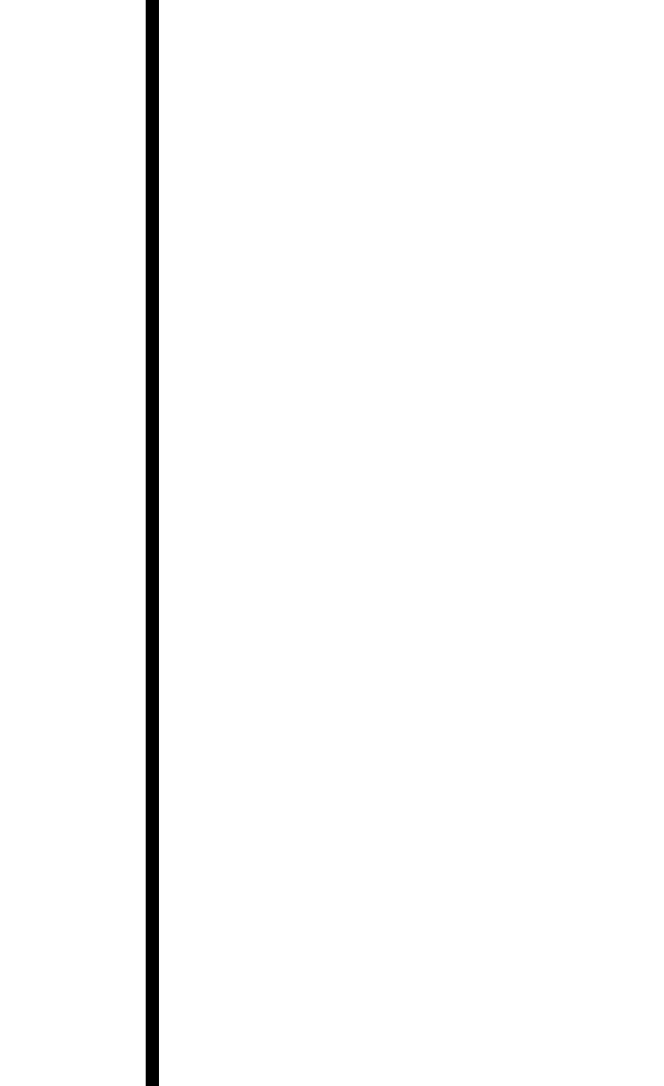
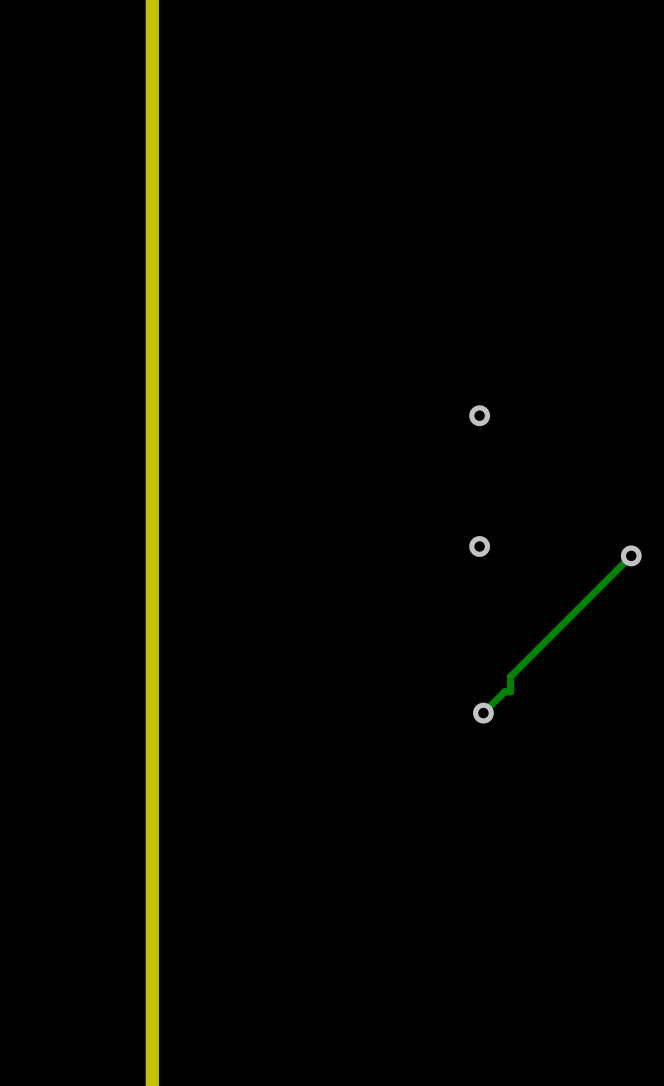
via: none -> (479, 415)
via: none -> (479, 546)
track: none -> (631, 555) (510, 676) (510, 691) (504, 691) (483, 713)
via: none -> (631, 555)
via: none -> (483, 713)

